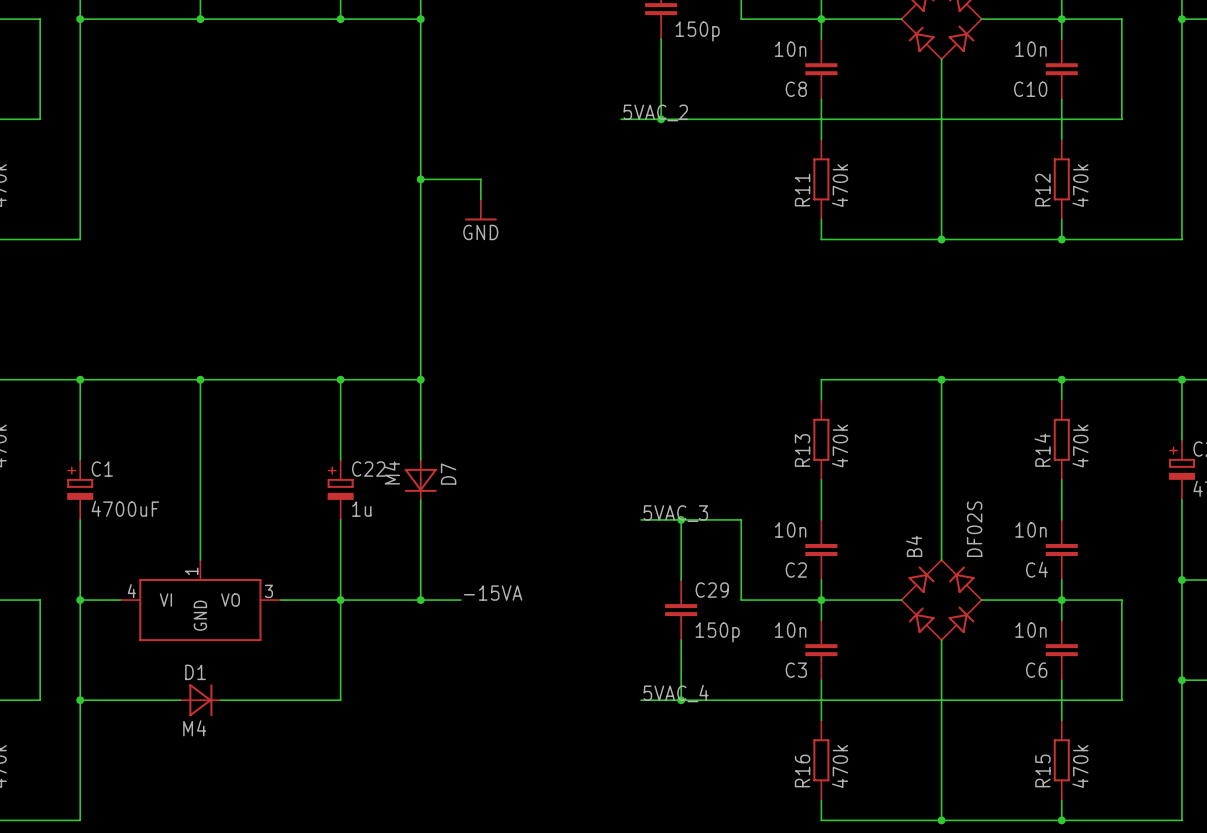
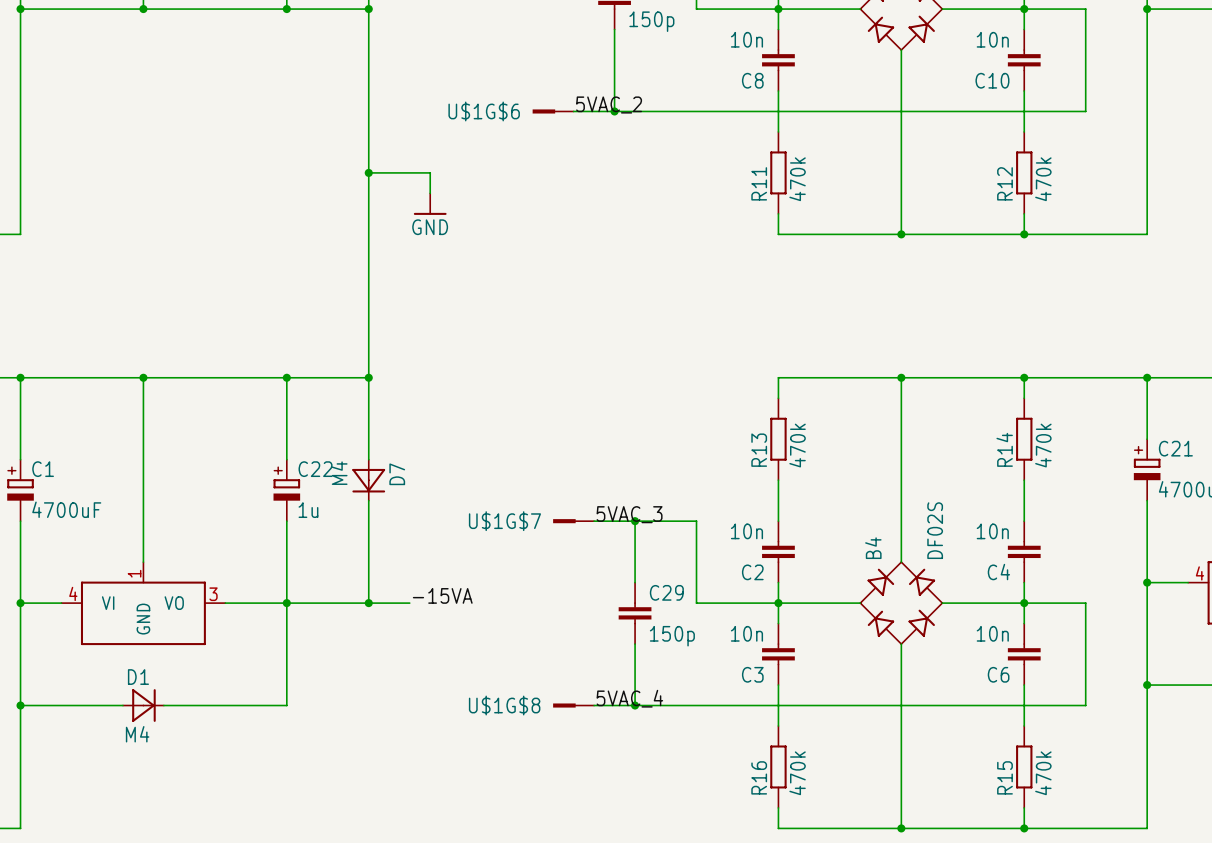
U$1G$6: none -> (553, 111)
U$1G$7: none -> (573, 521)
U$1G$8: none -> (573, 705)

